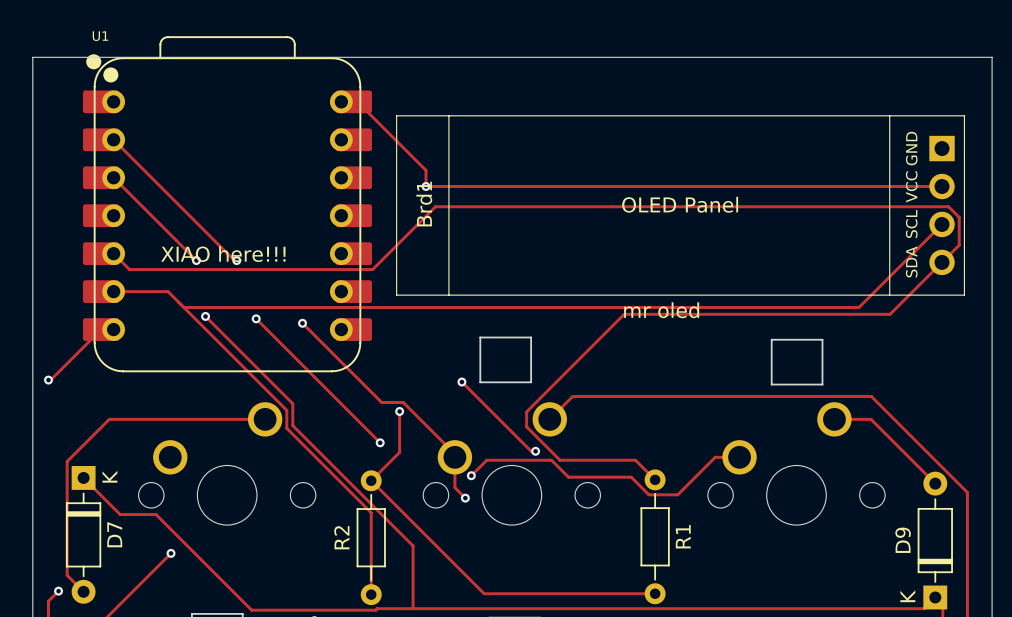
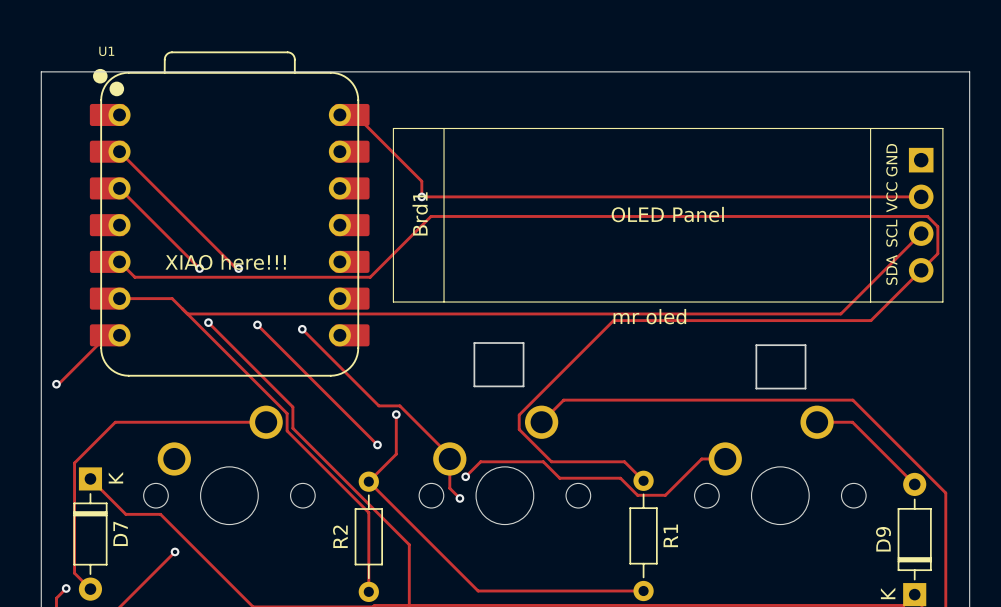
track: (461, 382) (531, 451) (535, 451) -> none
via: (461, 382) -> none
via: (535, 451) -> none

